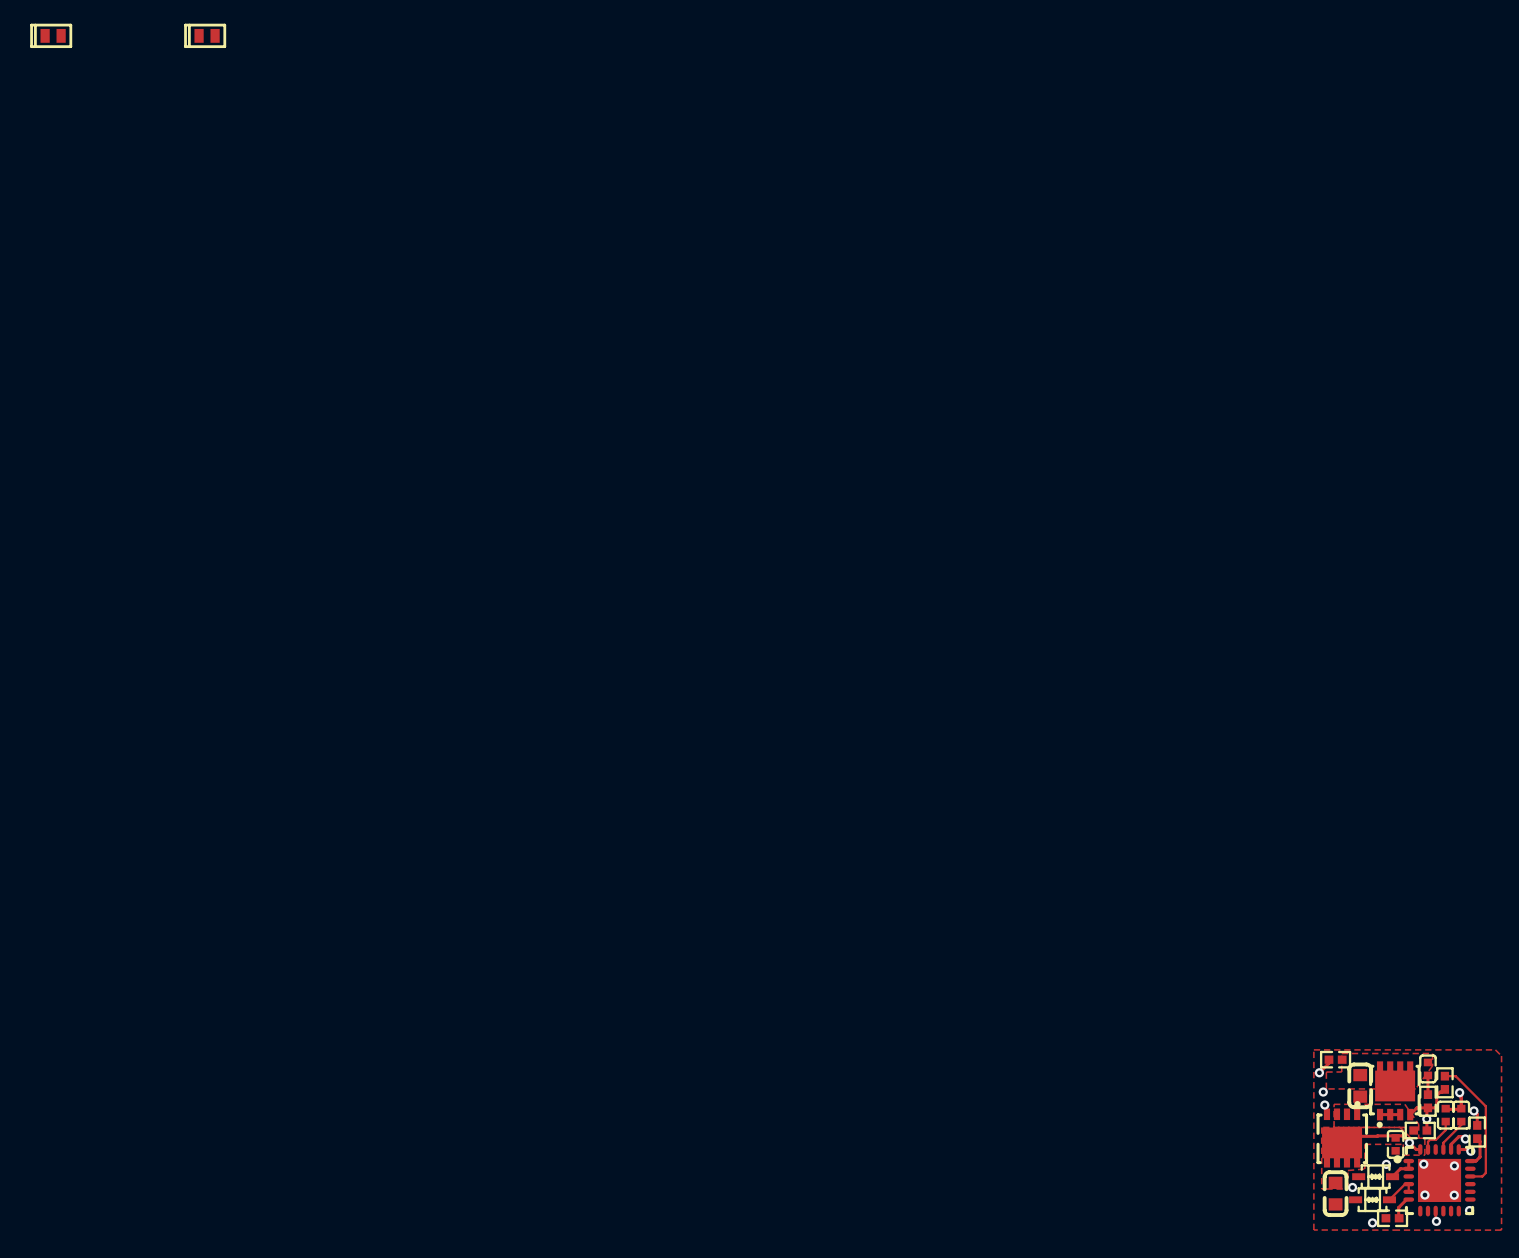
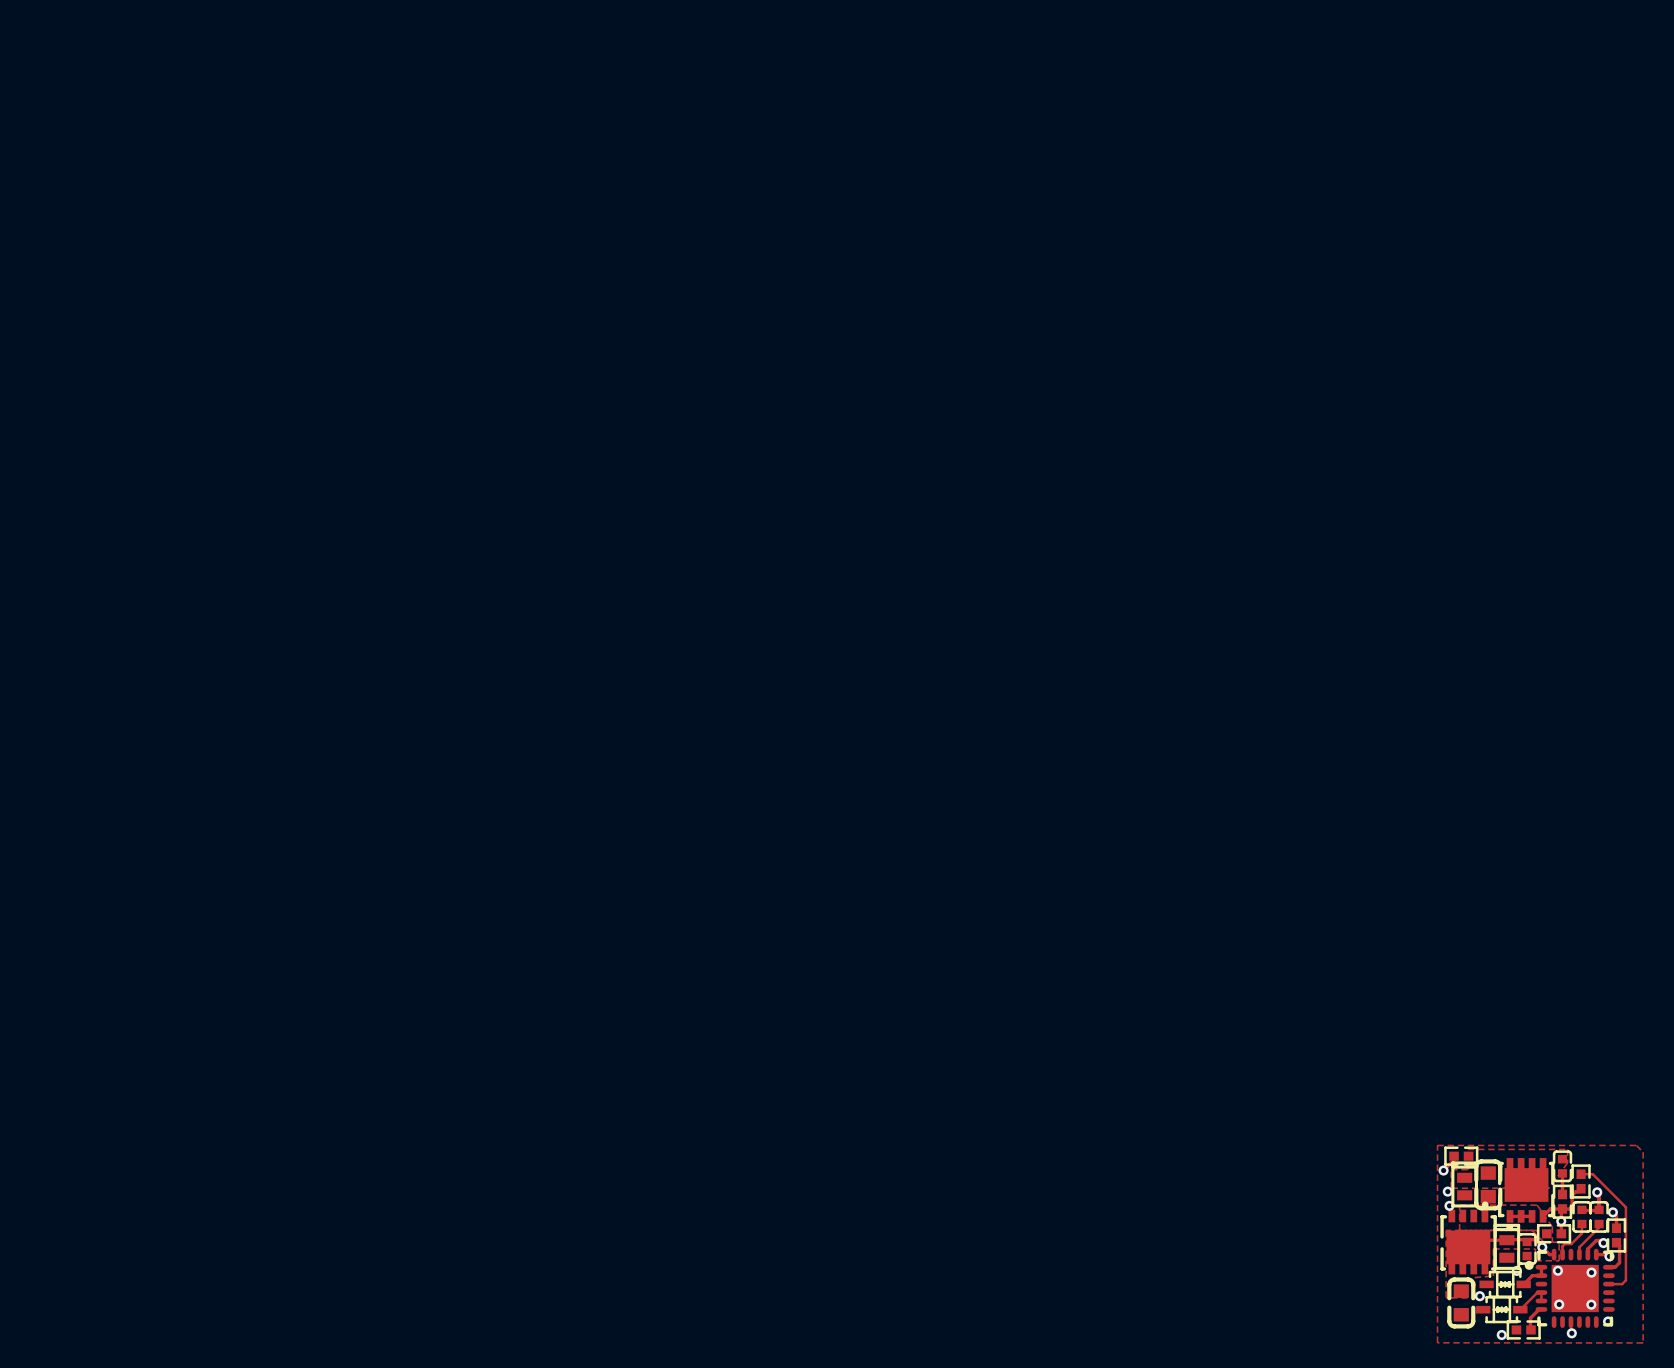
part: (51, 35) -> none
part: (205, 35) -> none
part: none -> (1464, 1184)
part: none -> (1506, 1246)

